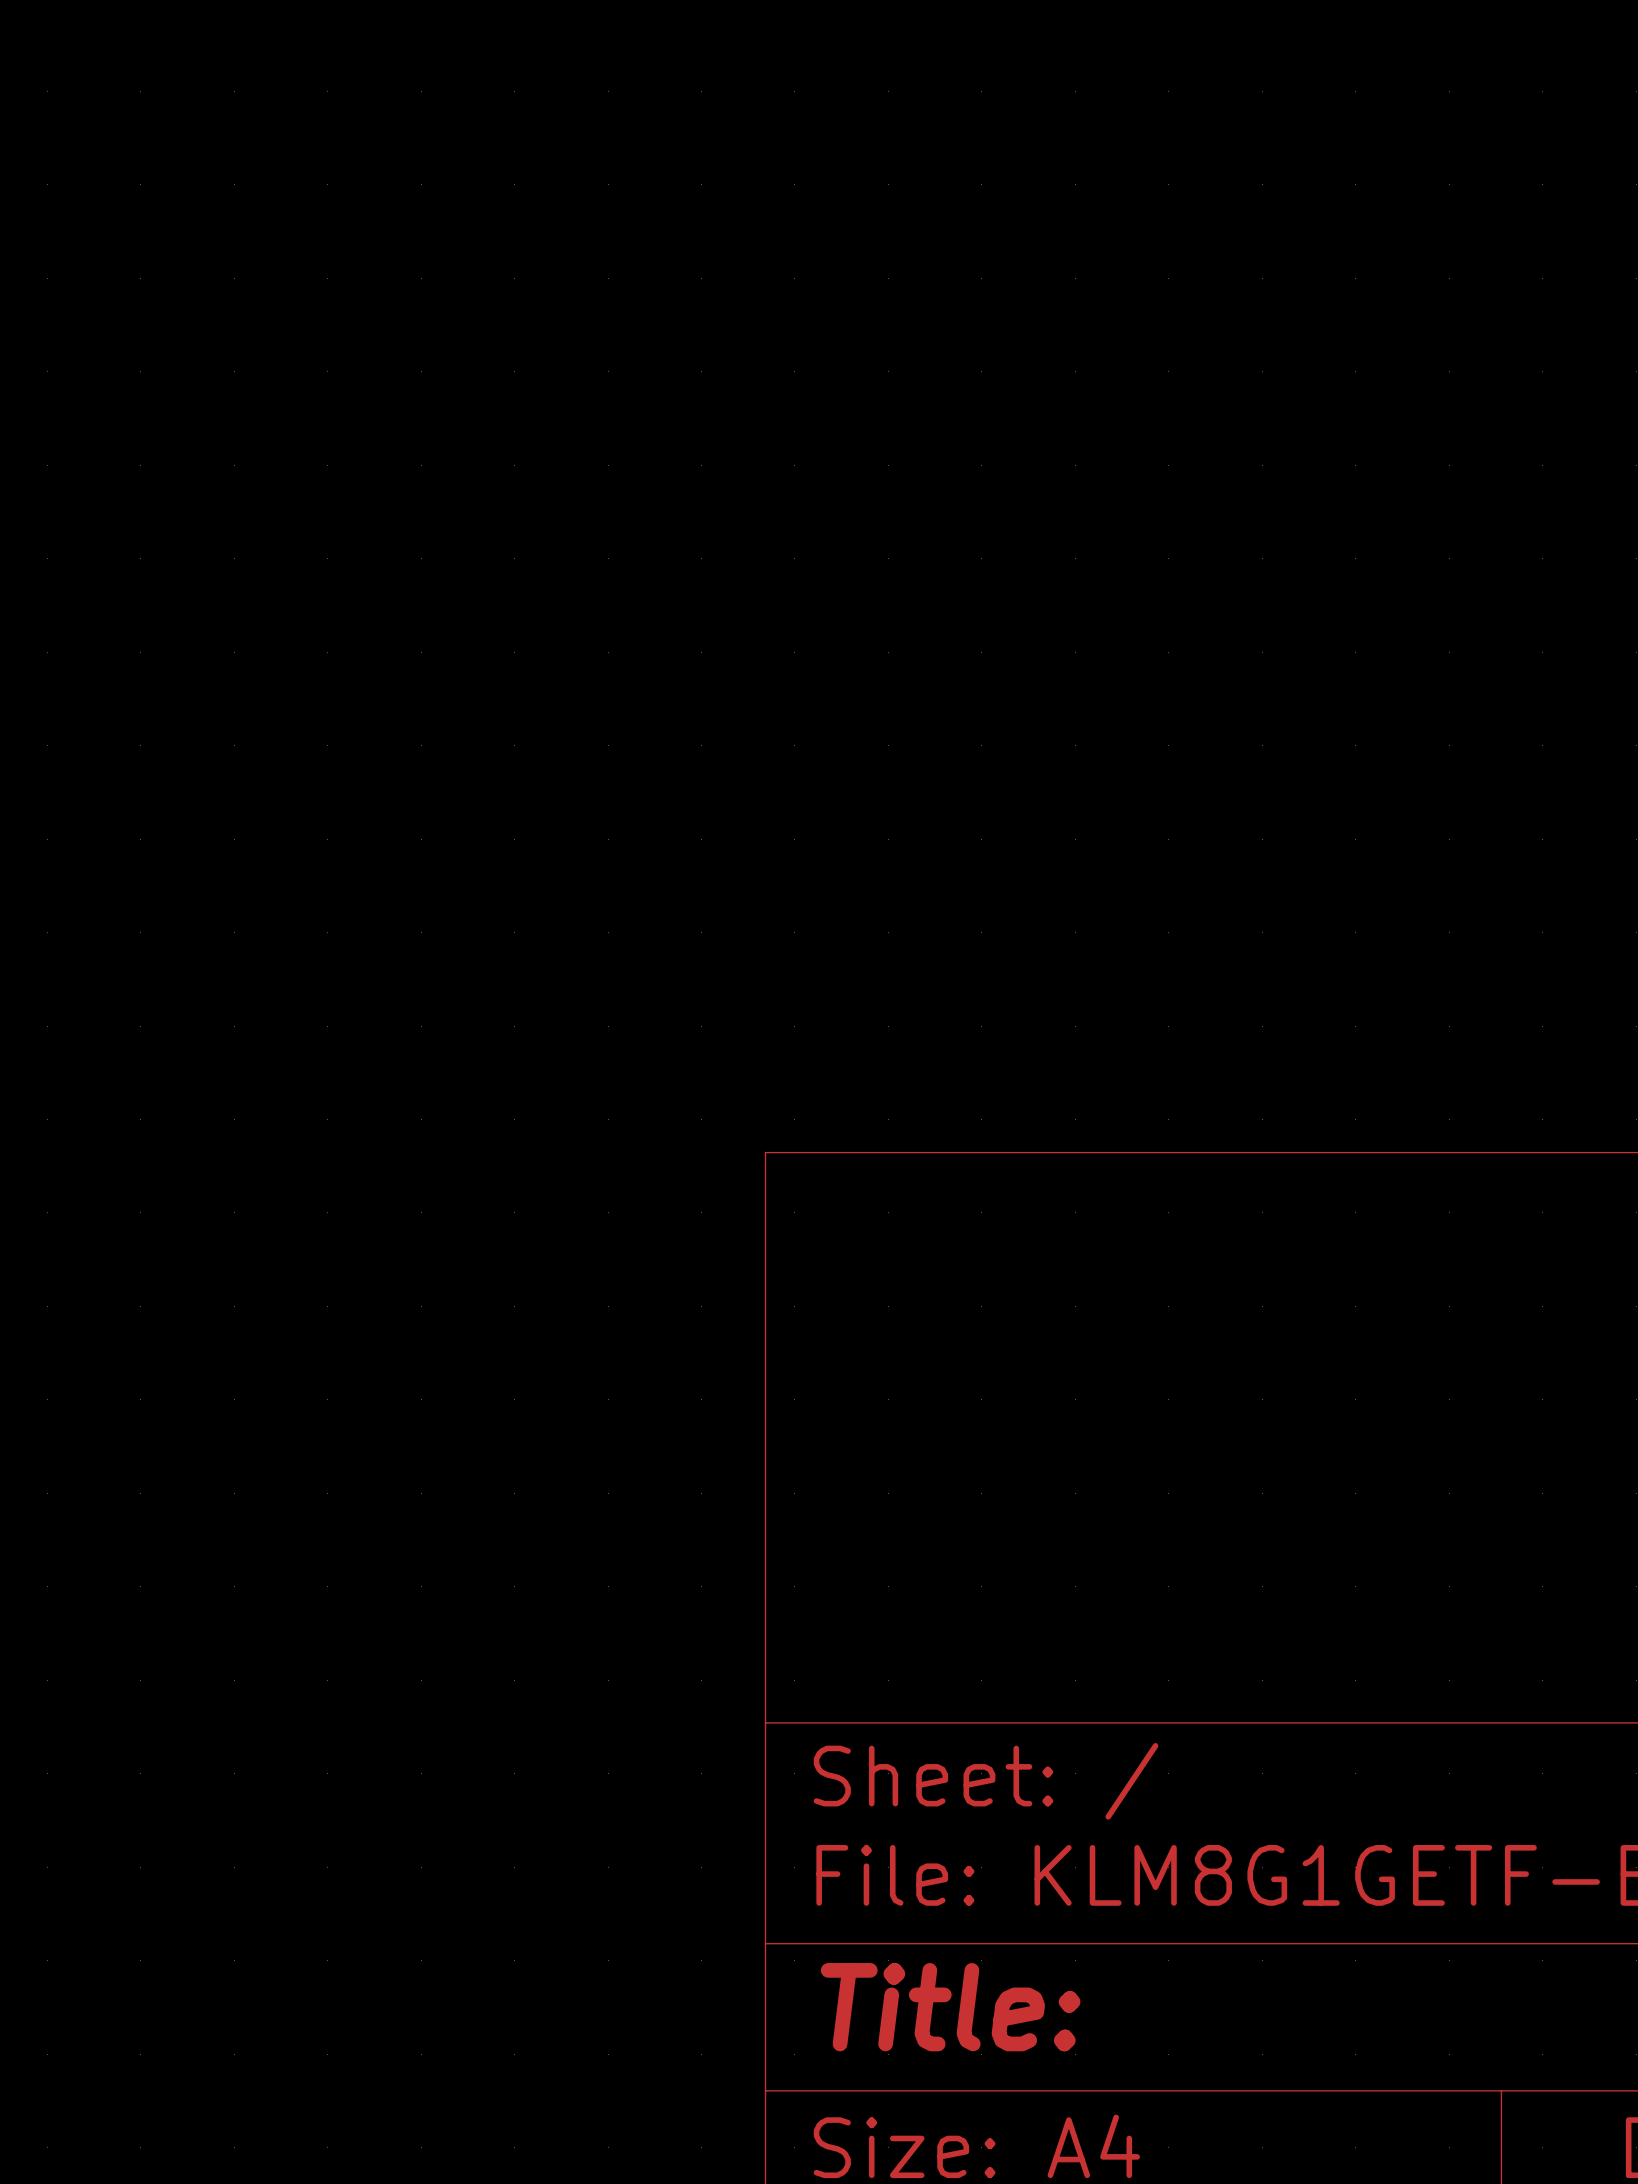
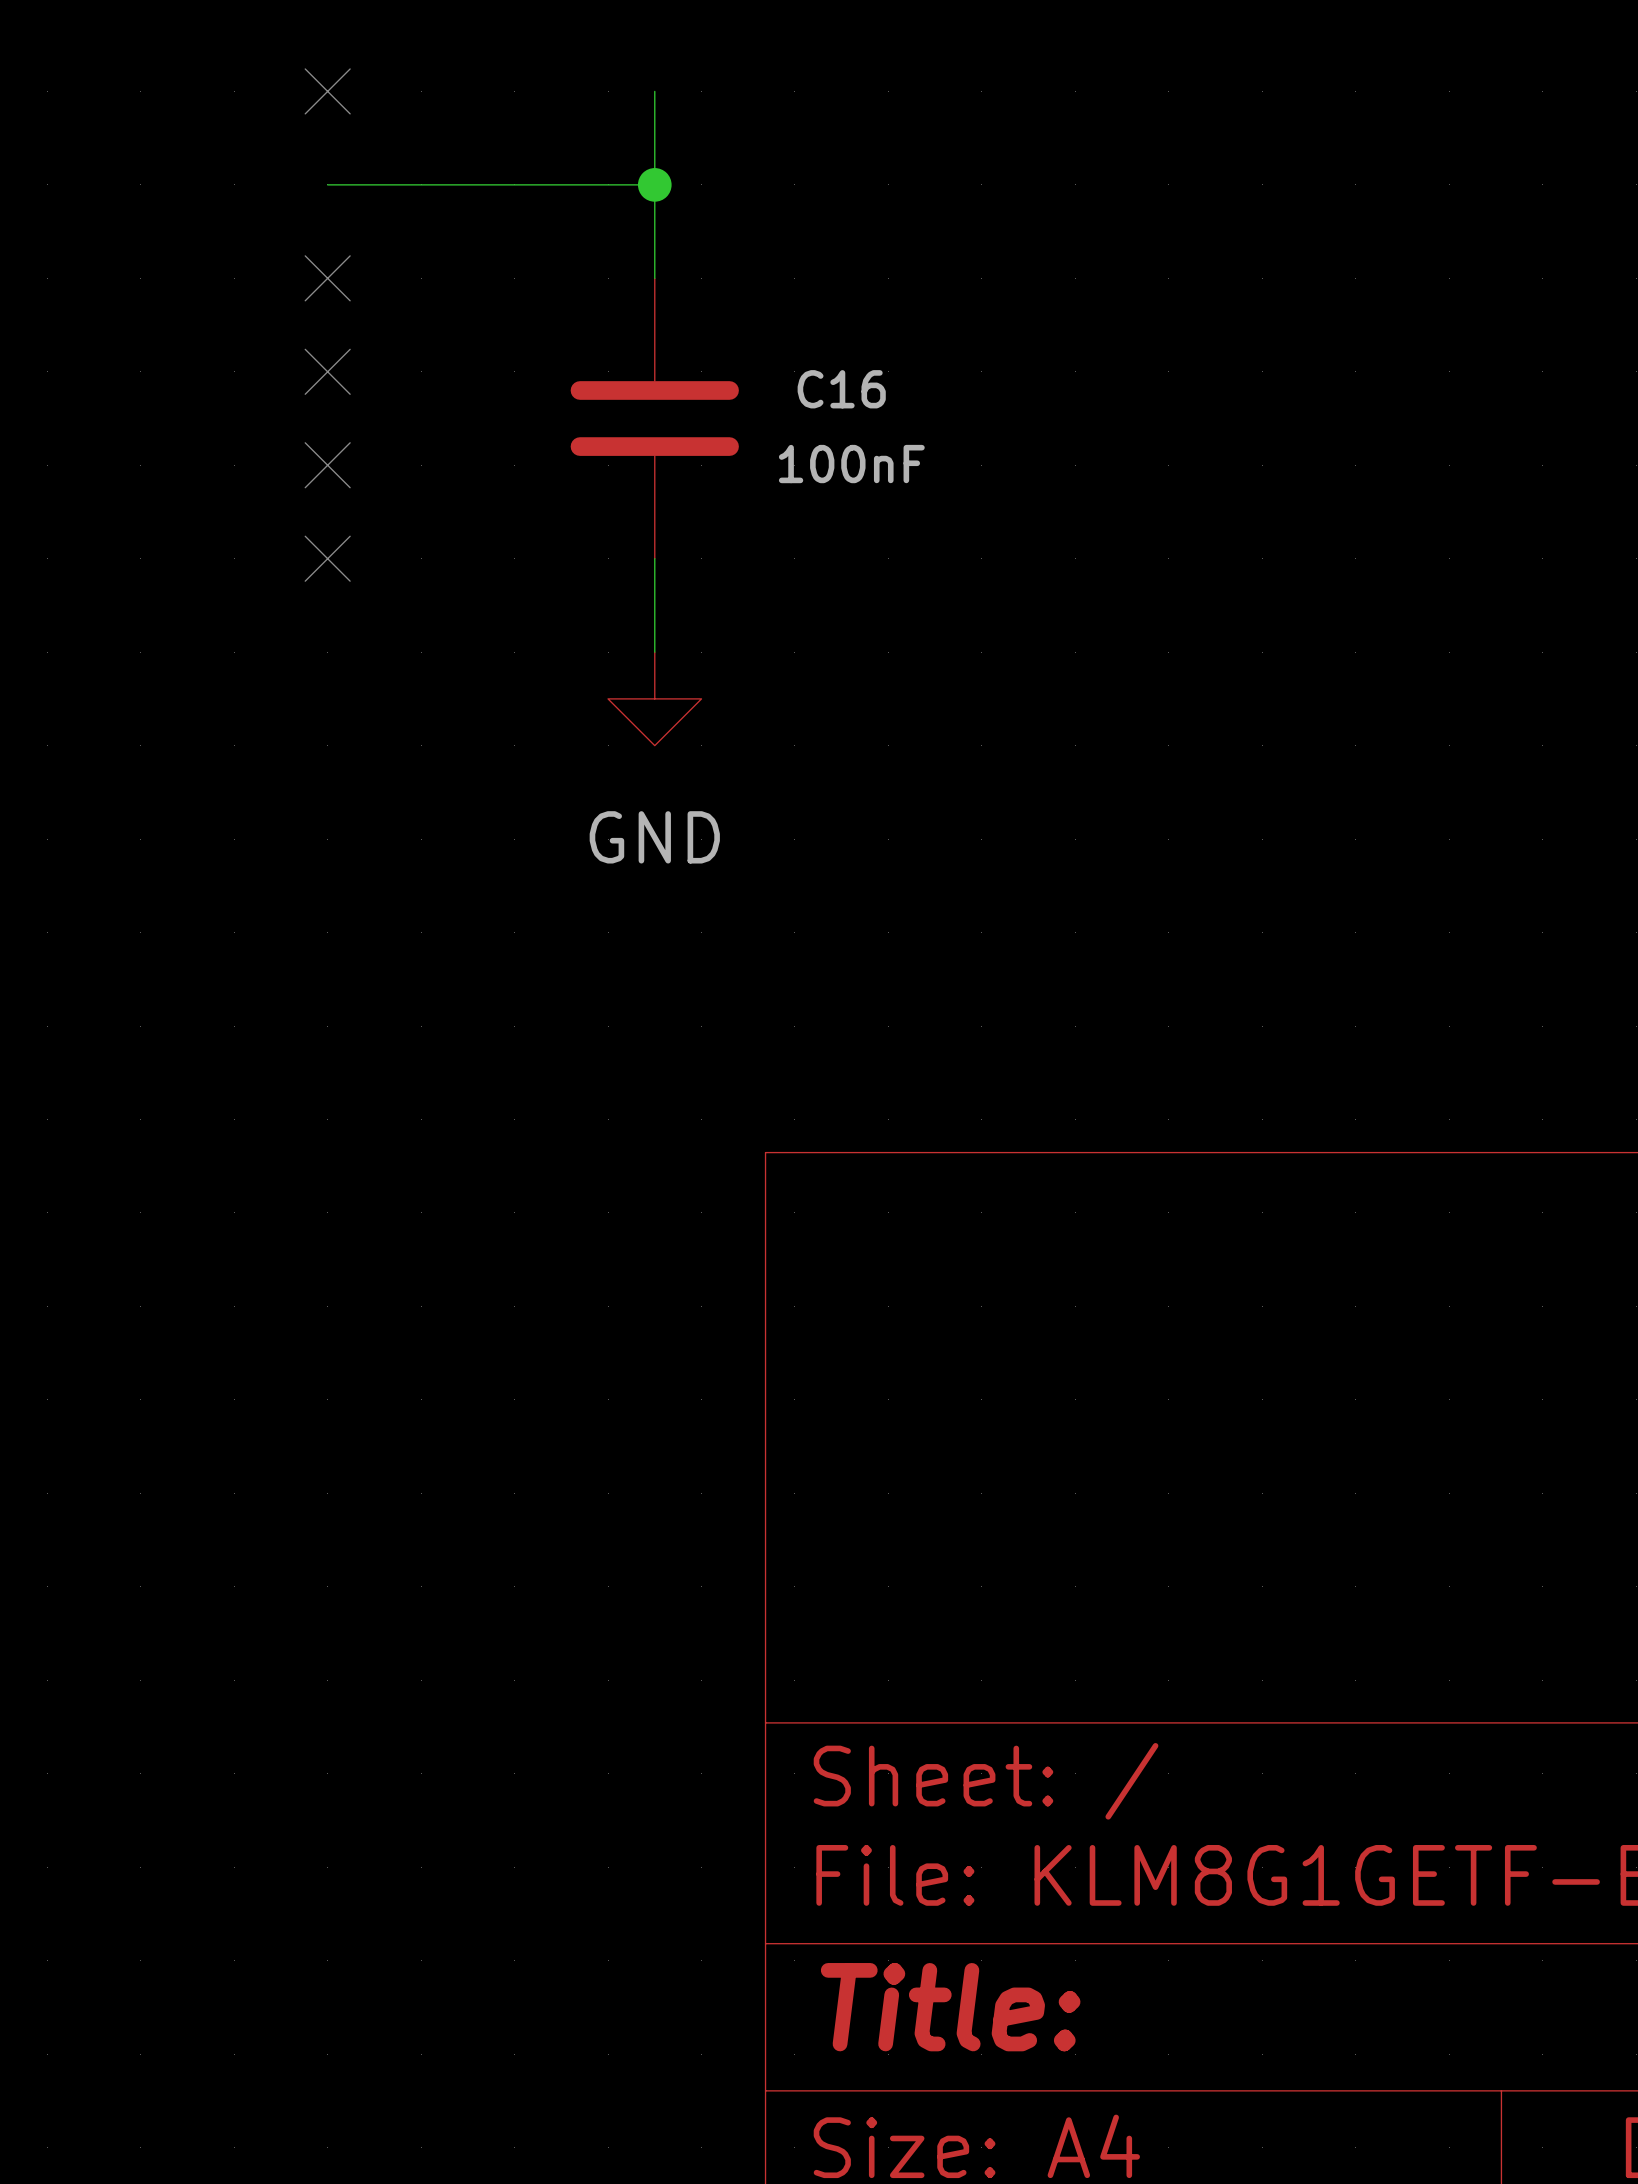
no-connect mark: none -> (327, 91)
wire: none -> (654, 91) (654, 278)
wire: none -> (327, 184) (654, 184)
junction: none -> (654, 184)
no-connect mark: none -> (327, 278)
no-connect mark: none -> (327, 371)
C16: none -> 100nF (654, 418)
no-connect mark: none -> (327, 465)
no-connect mark: none -> (327, 558)
wire: none -> (654, 558) (654, 652)
power symbol: none -> GND (654, 698)

